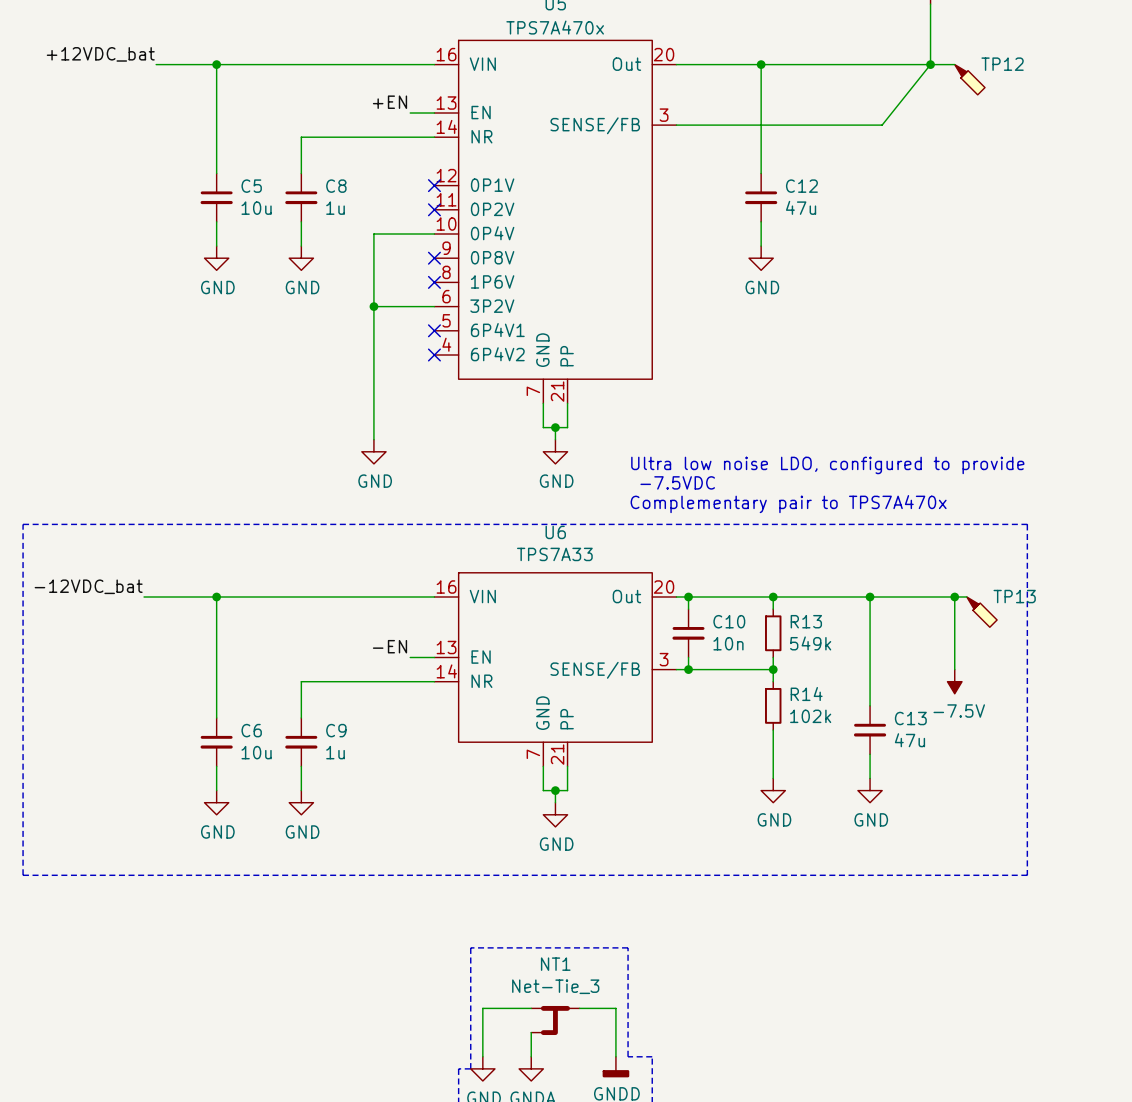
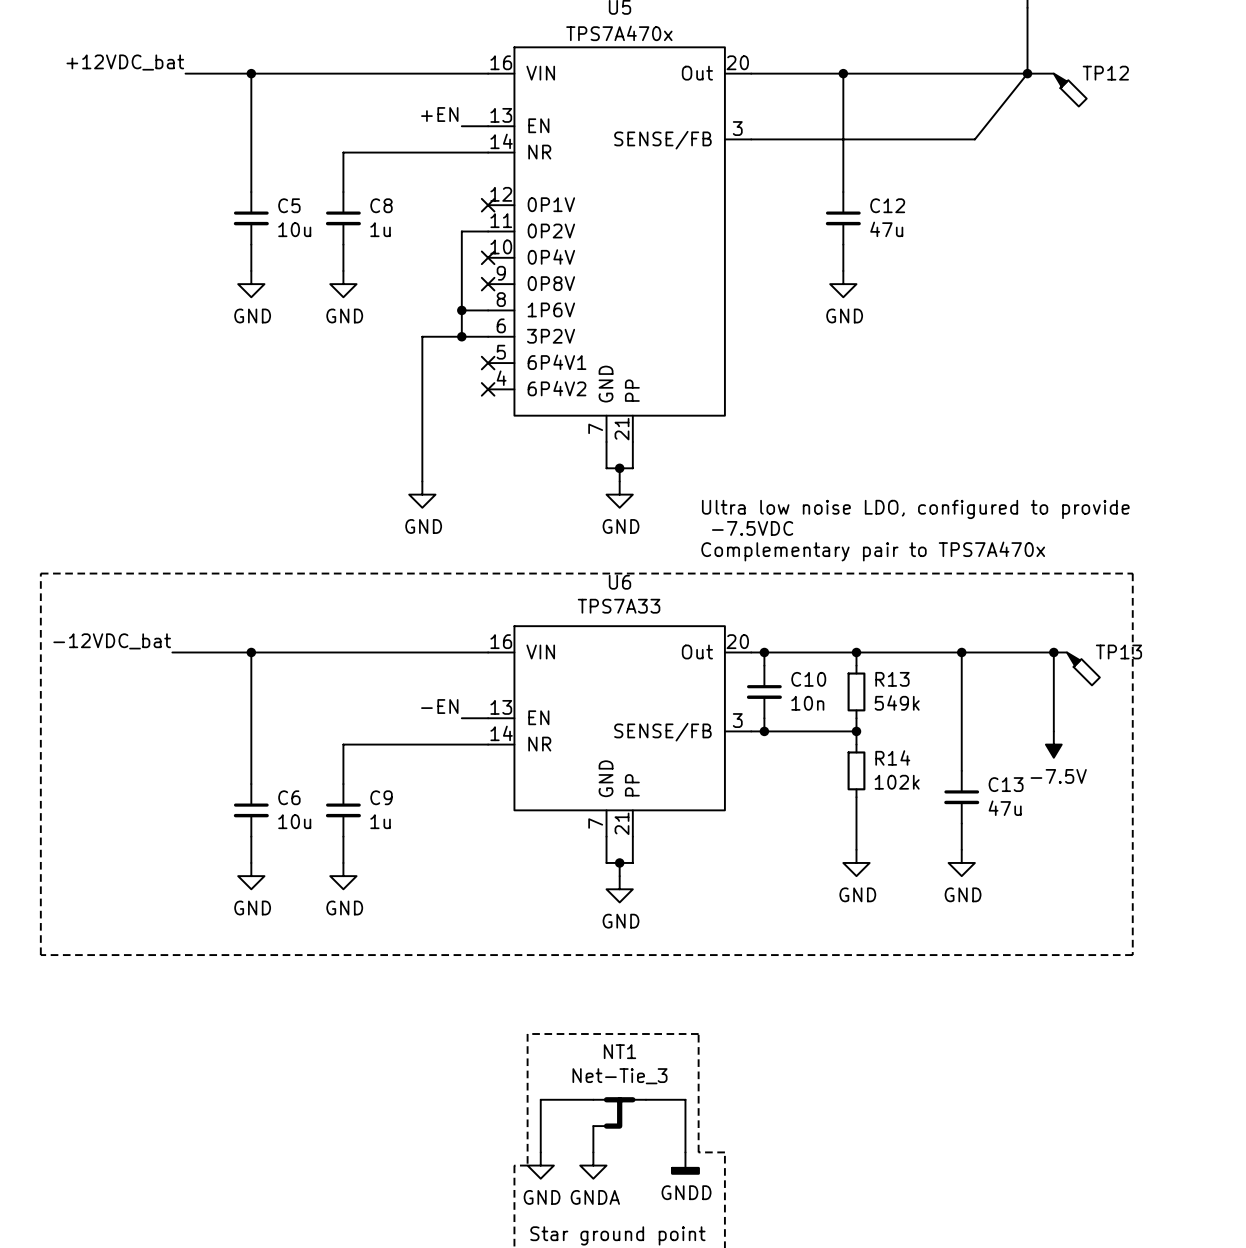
wire: none -> (488, 231) (461, 231) (461, 336)
no-connect mark: (434, 209) -> none
wire: (434, 234) (373, 234) (373, 306) -> none
no-connect mark: none -> (488, 257)
wire: none -> (461, 310) (488, 310)
junction: none -> (461, 310)
no-connect mark: (434, 282) -> none
junction: (373, 306) -> none
junction: none -> (461, 336)

